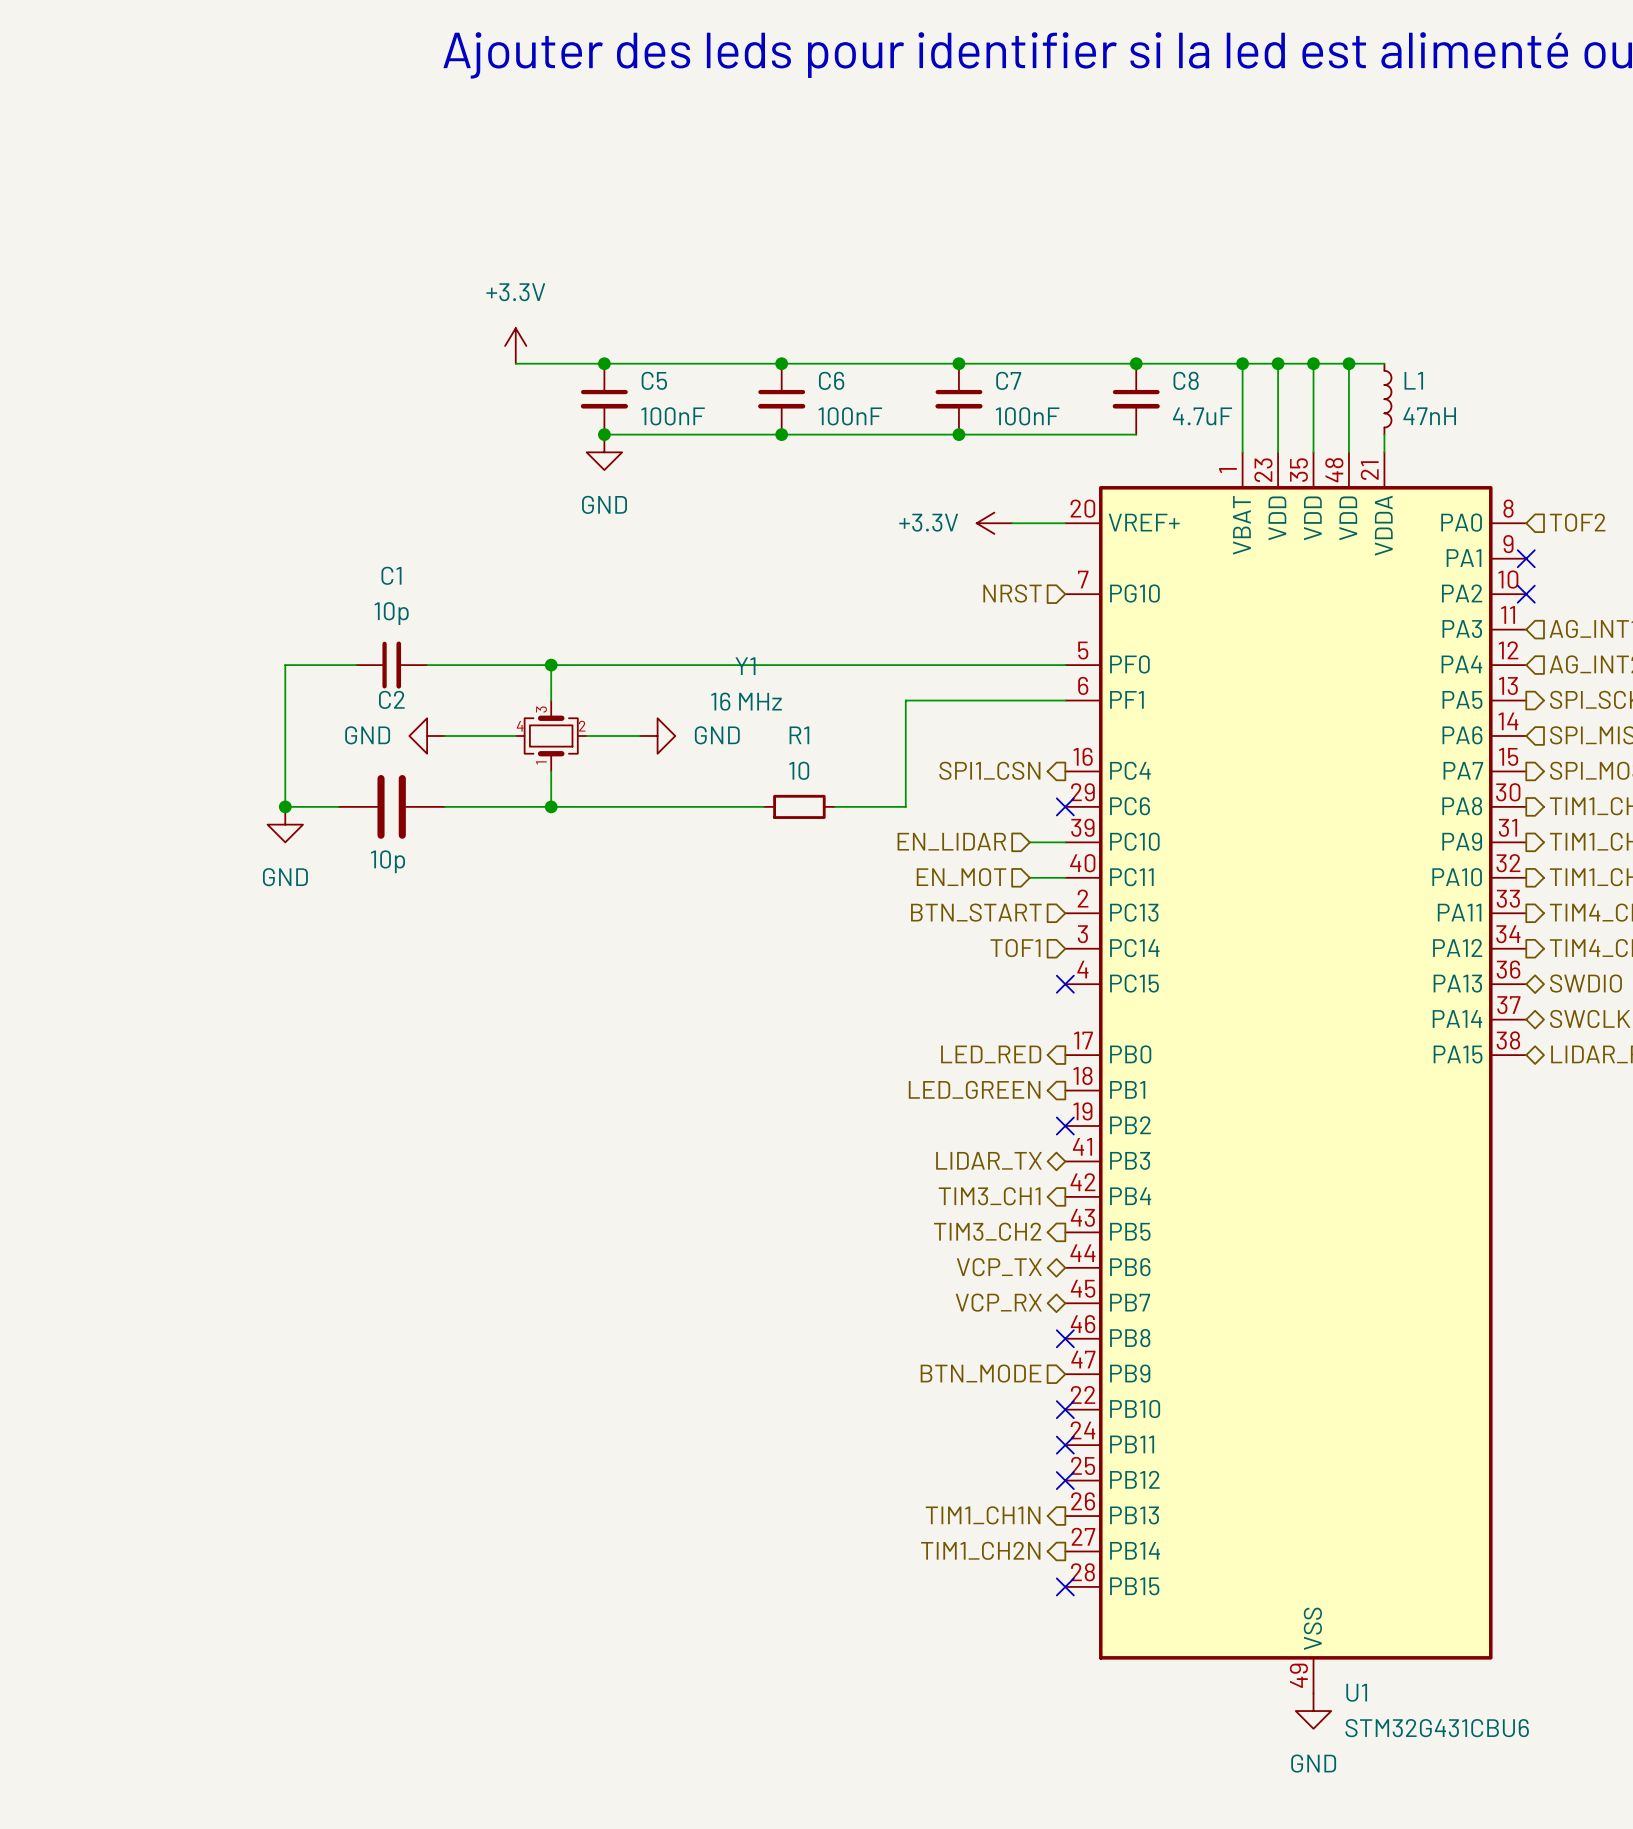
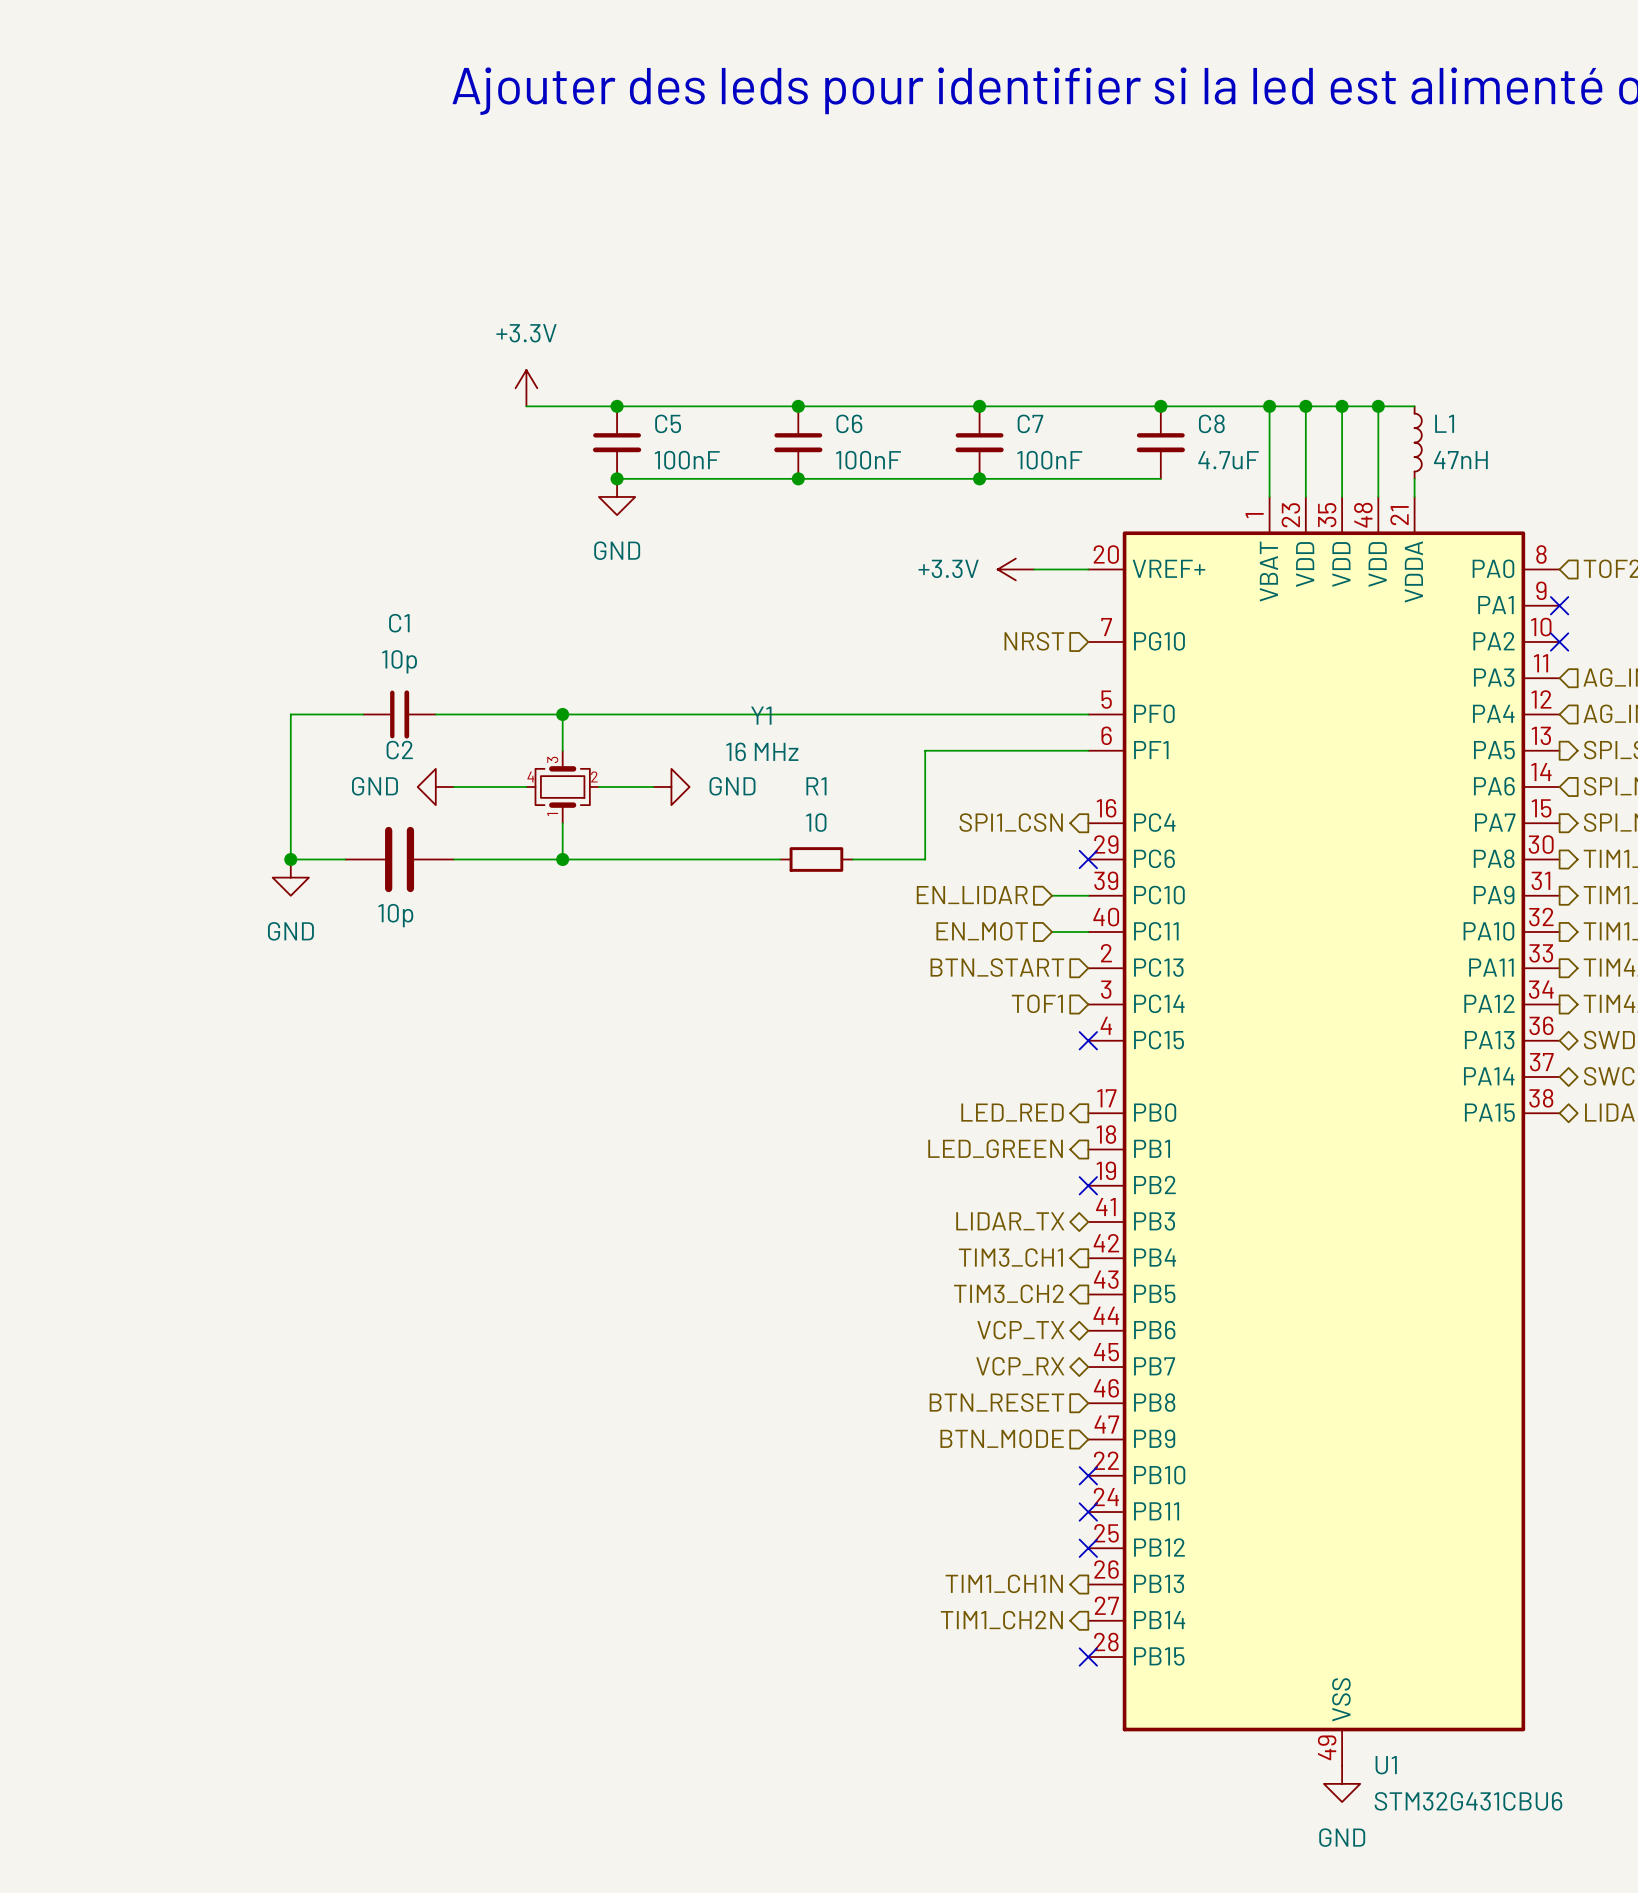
hierarchical label: none -> BTN_RESET (996, 1402)
no-connect mark: (1065, 1338) -> none

